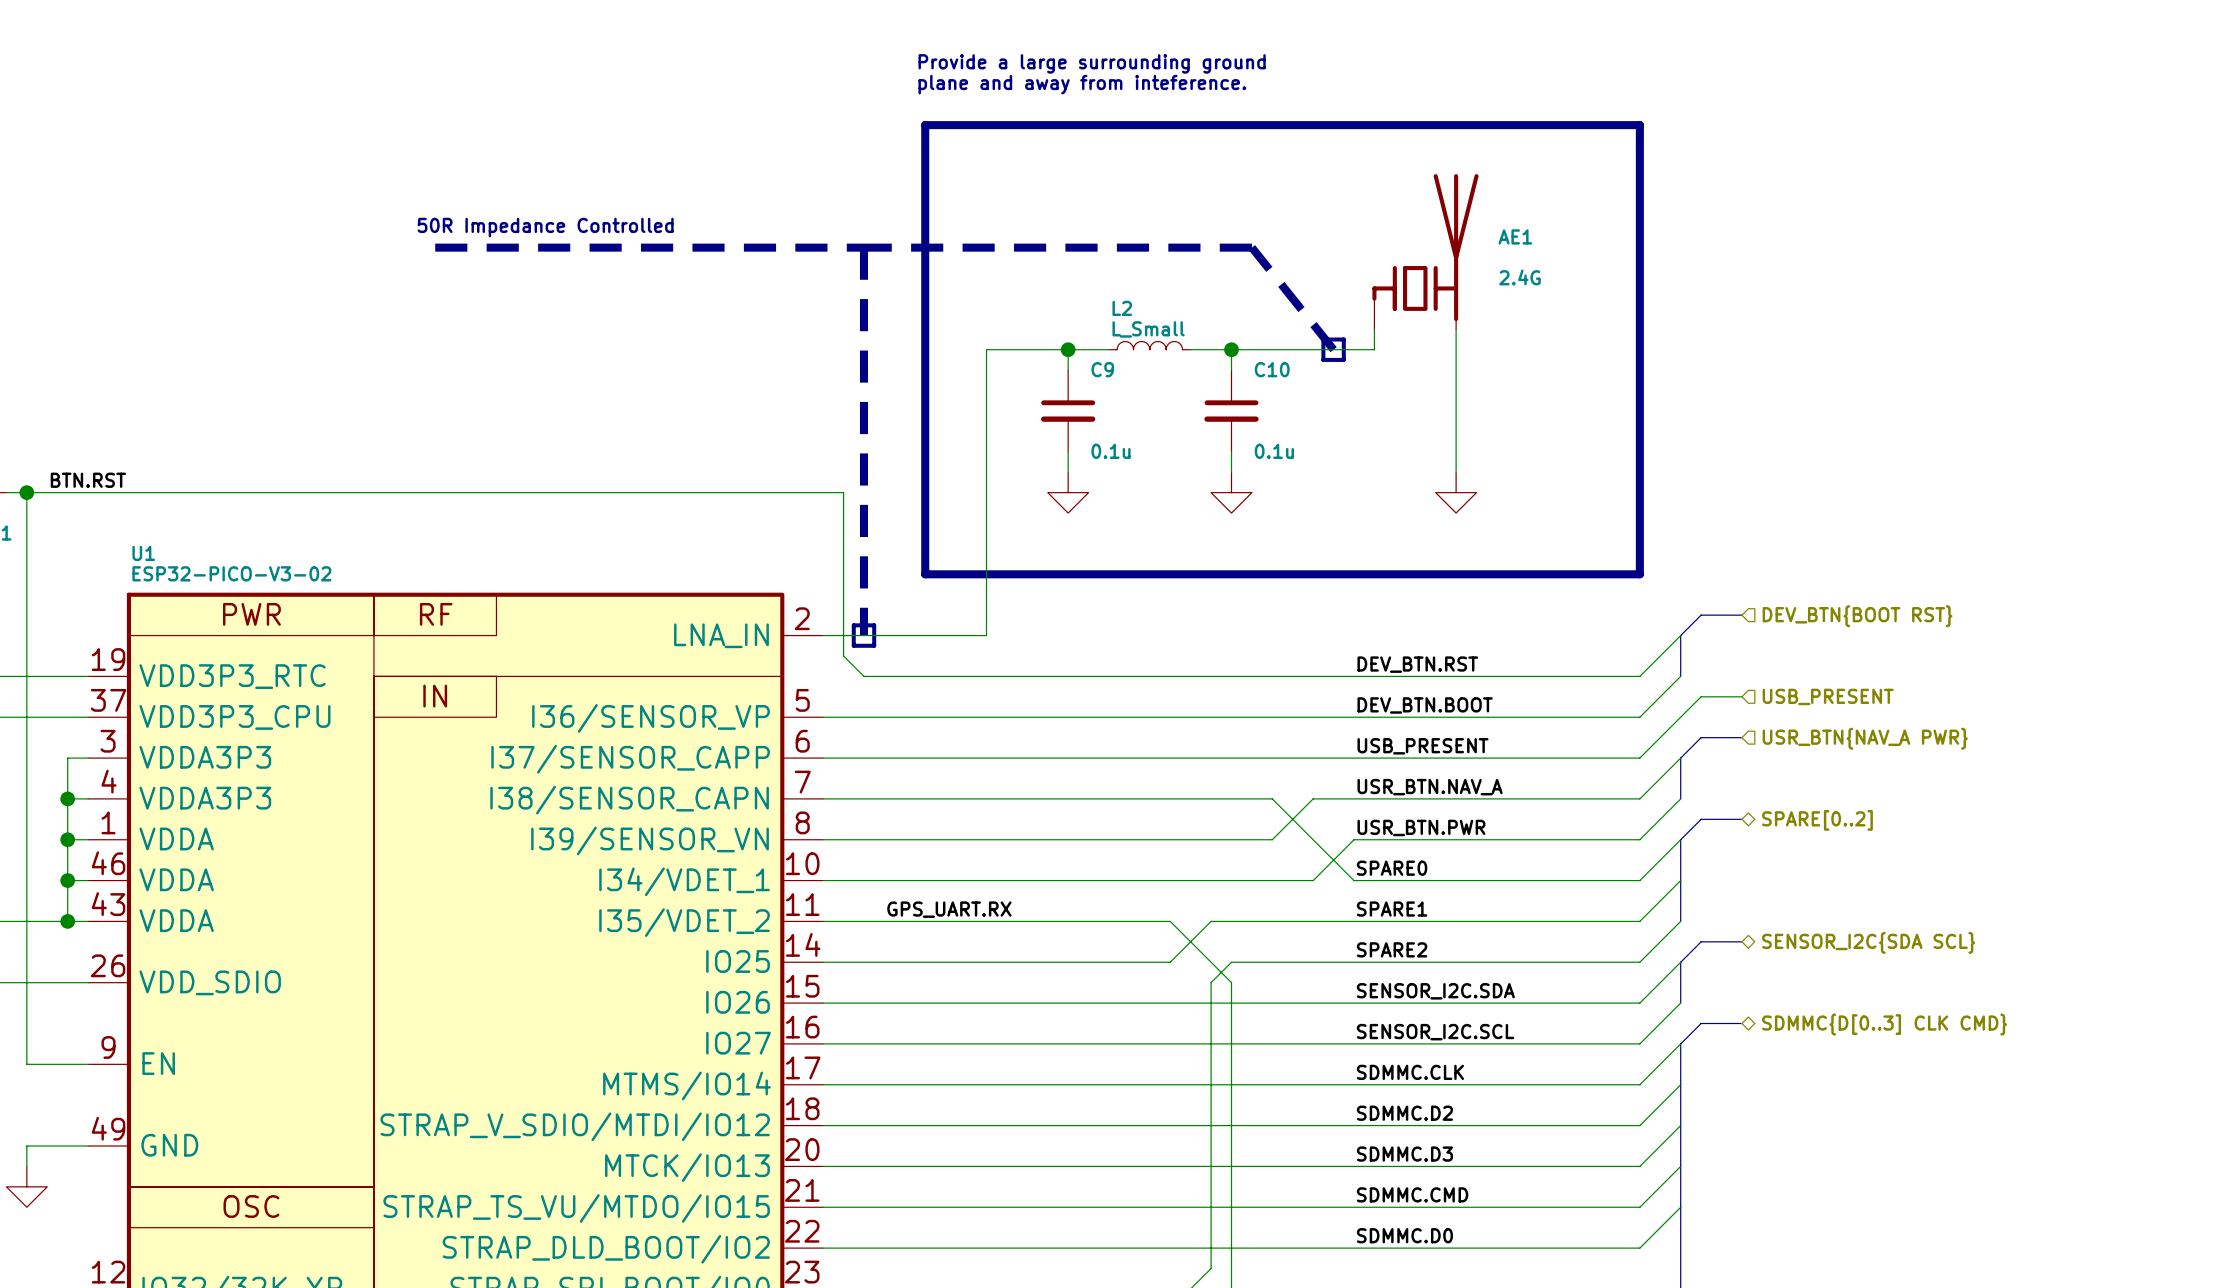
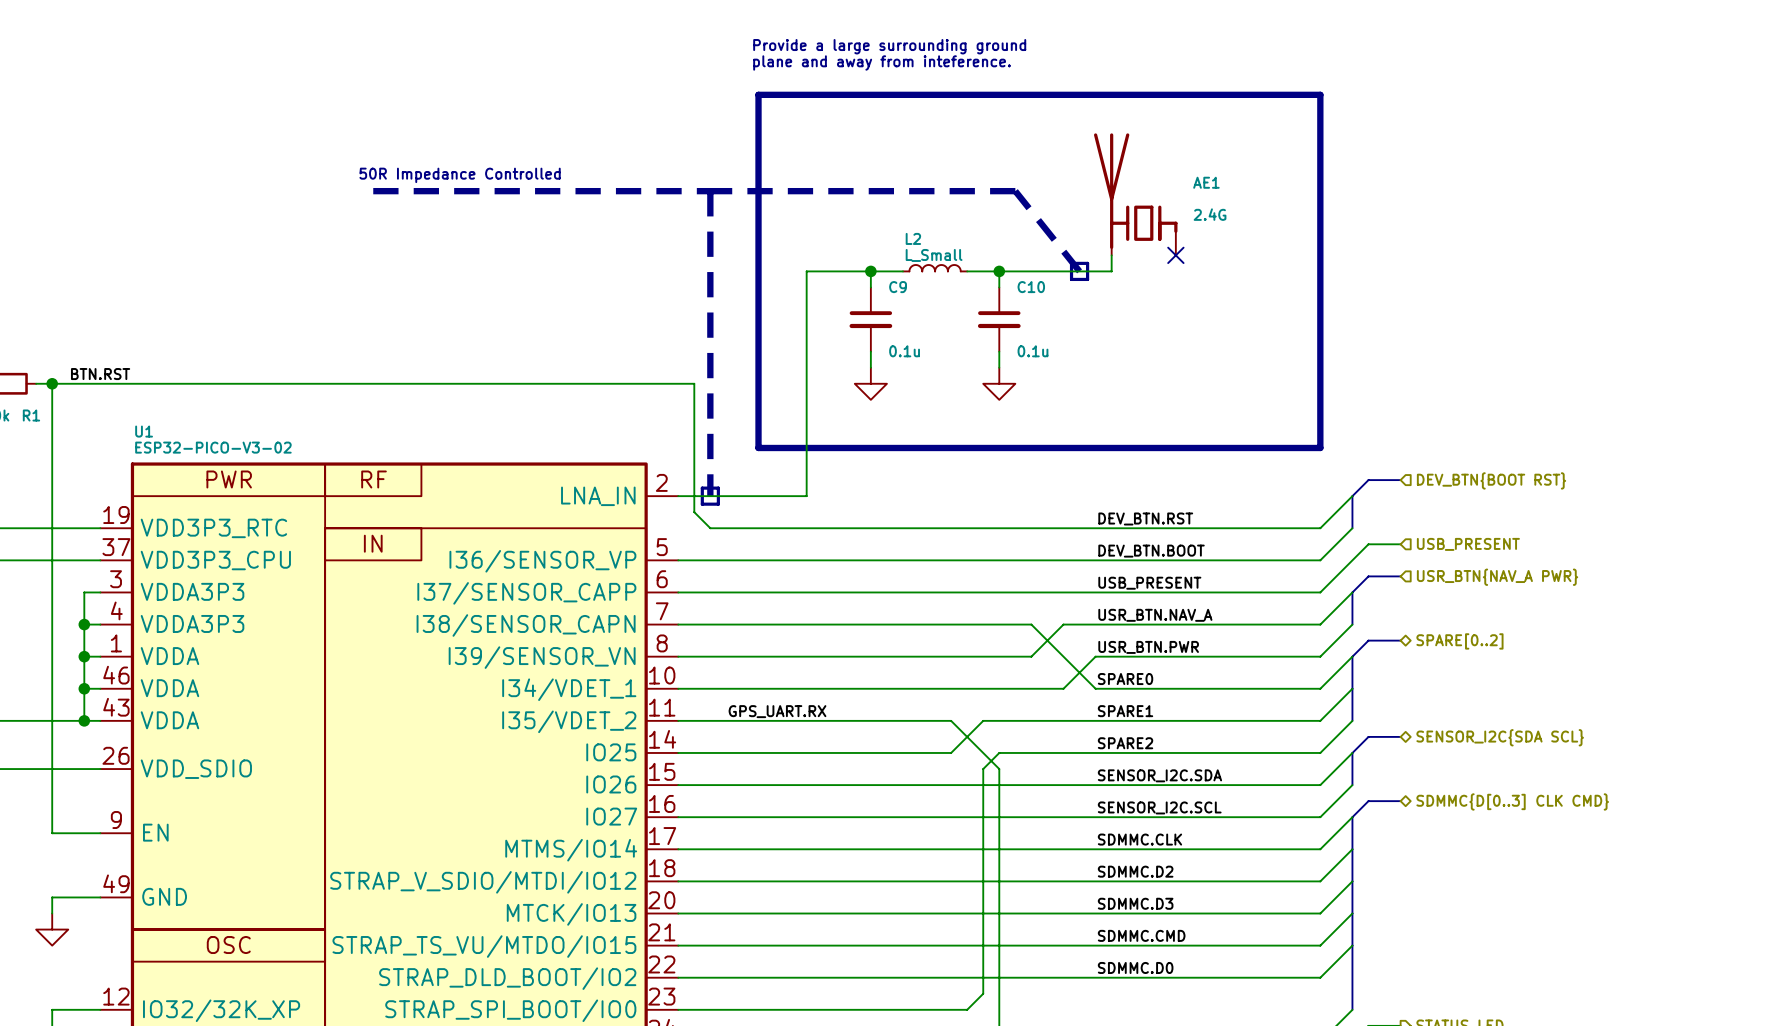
AE1 flip: as is (1425, 247) -> left-right (1135, 191)
wire: (1456, 329) (1456, 472) -> none
no-connect mark: none -> (1175, 255)
power symbol: (1456, 492) -> none

